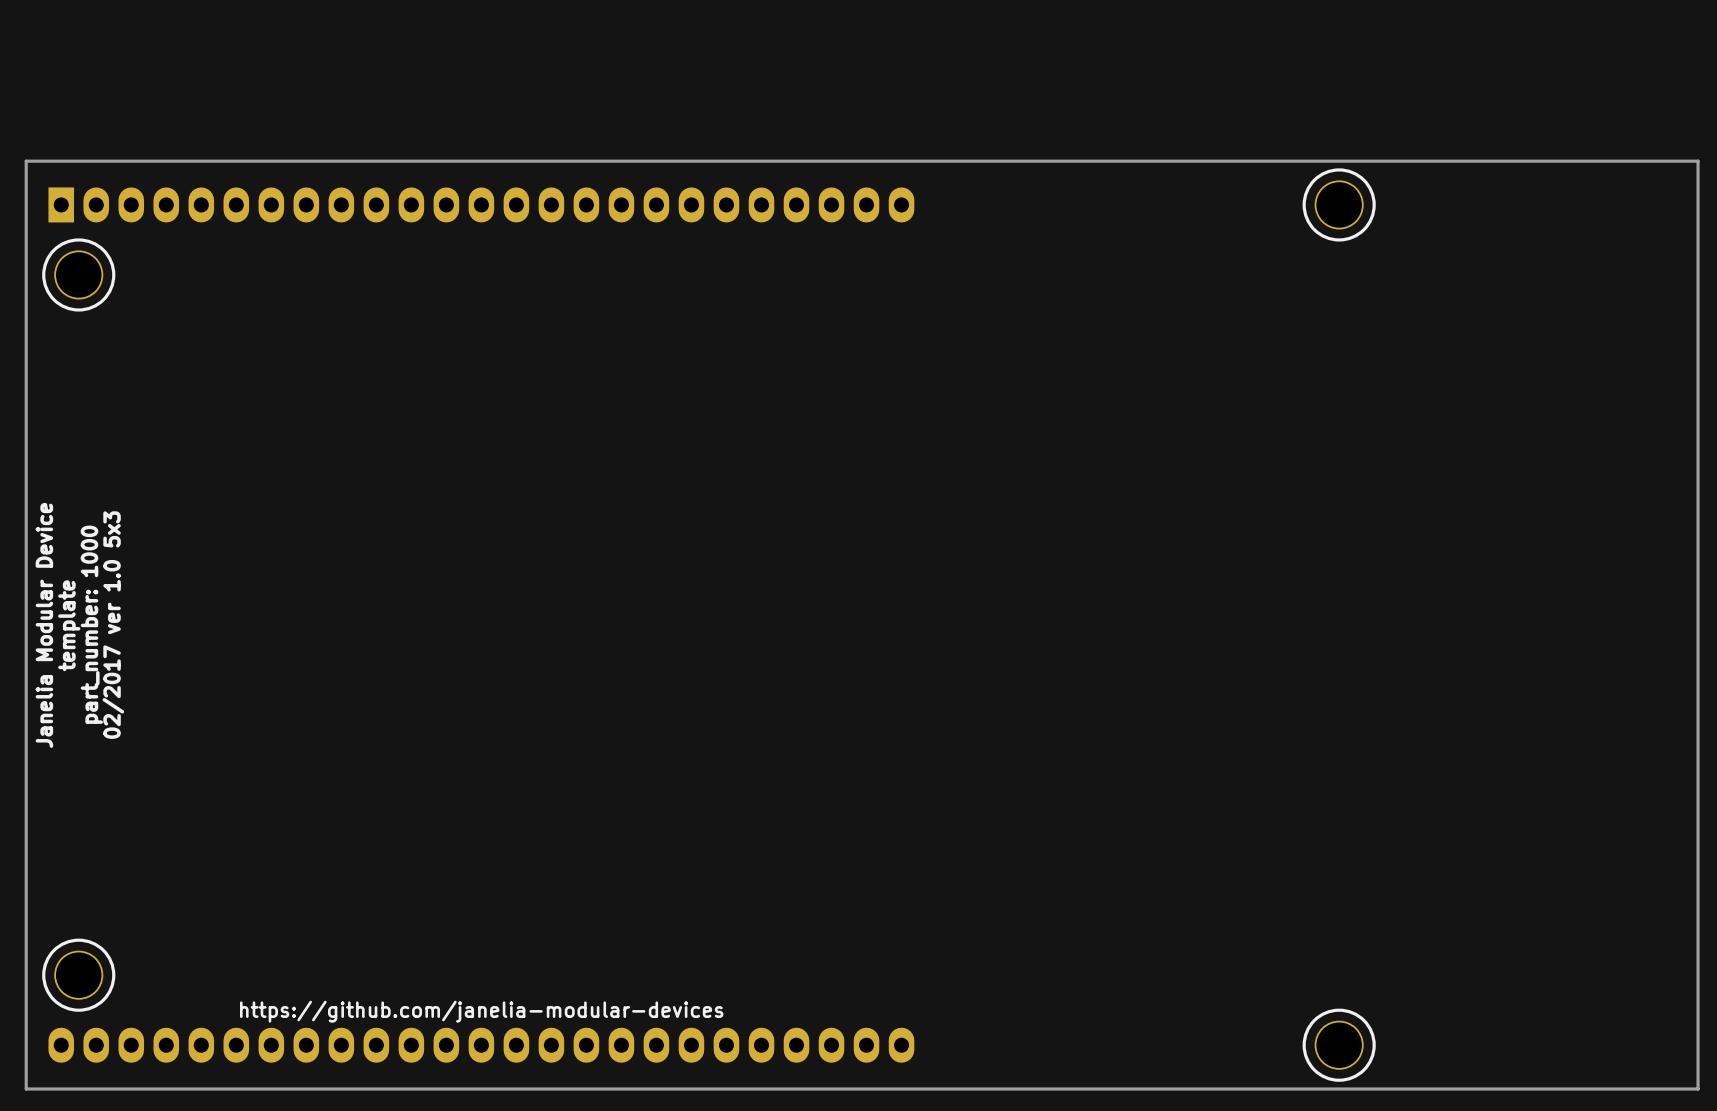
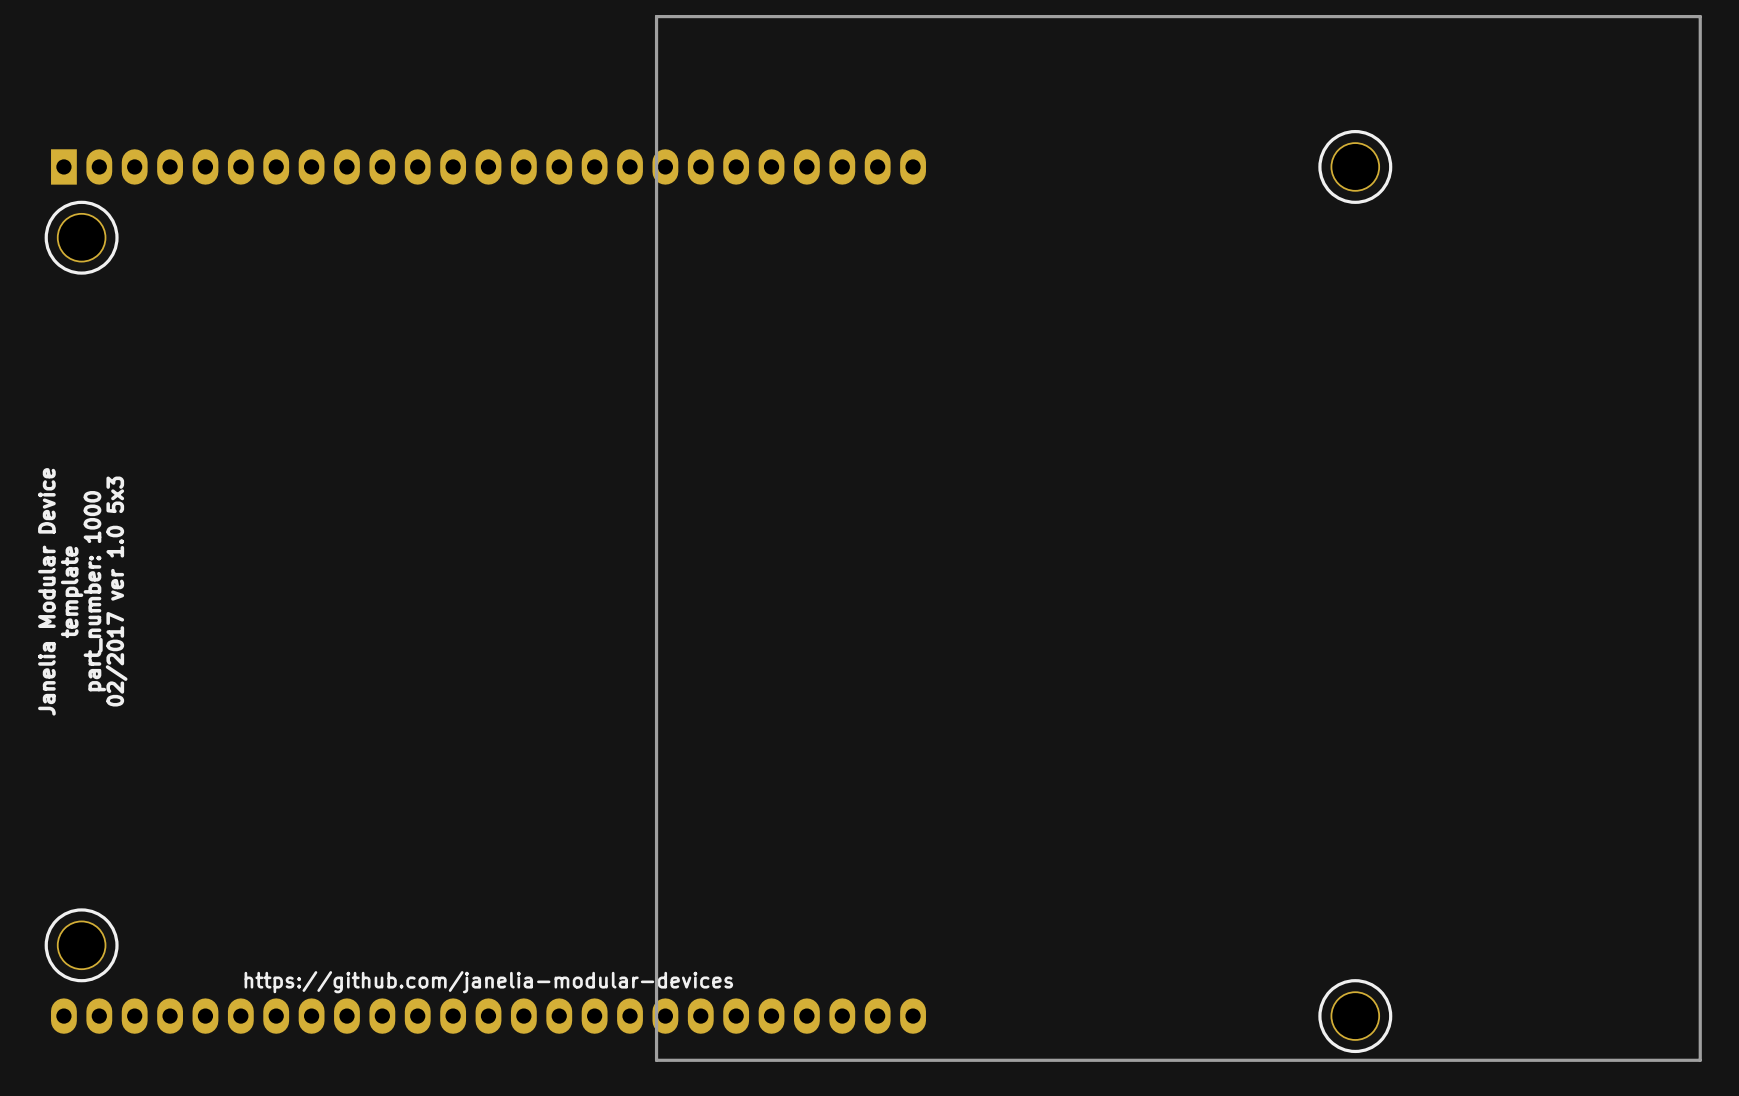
board edge: (647, 1088) (26, 1088) (26, 161) (1698, 161) (1698, 1088) (1680, 1088) -> (656, 1060) (656, 16) (1700, 16) (1700, 1060)

